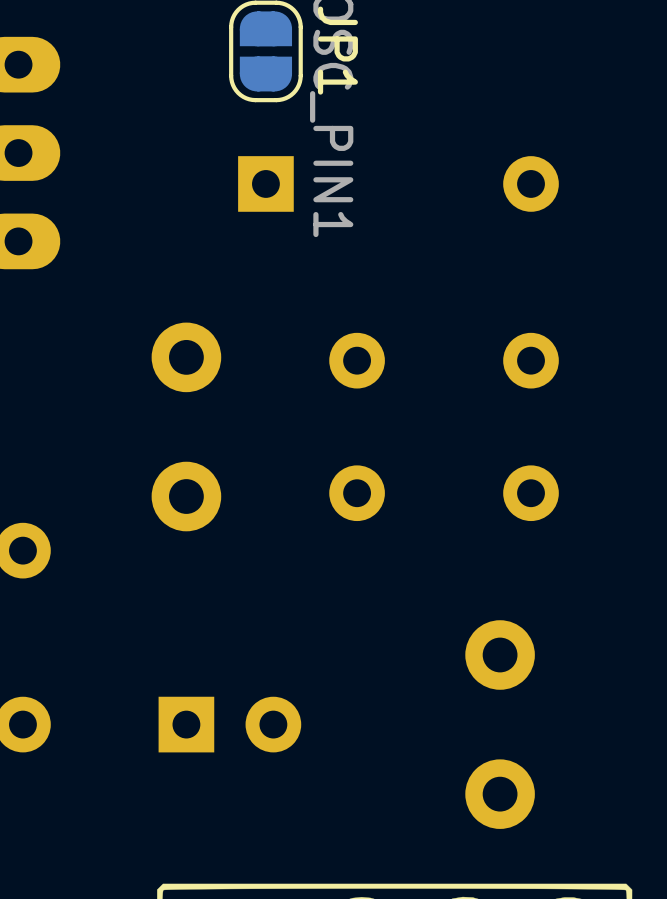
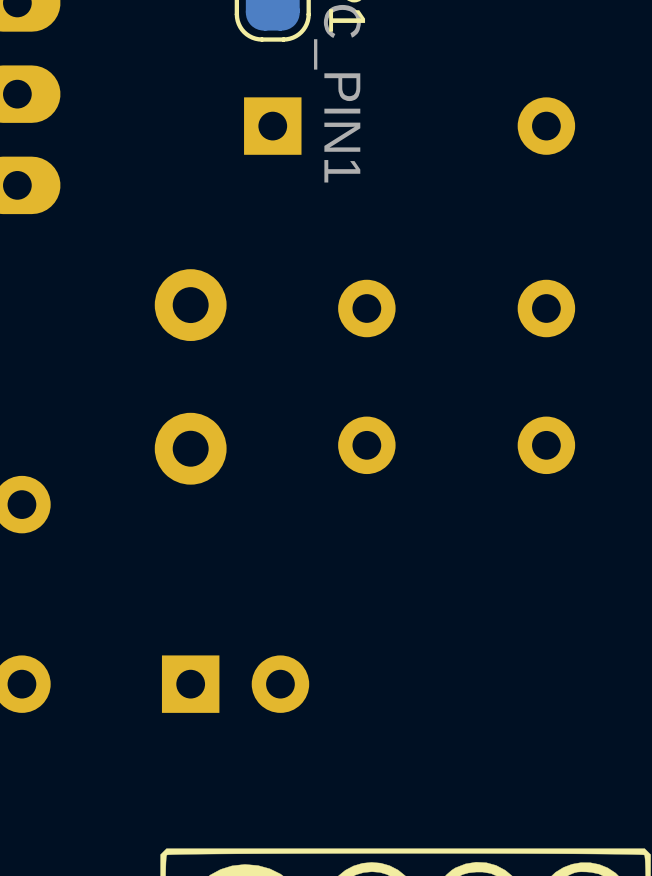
part: (500, 724) -> none

